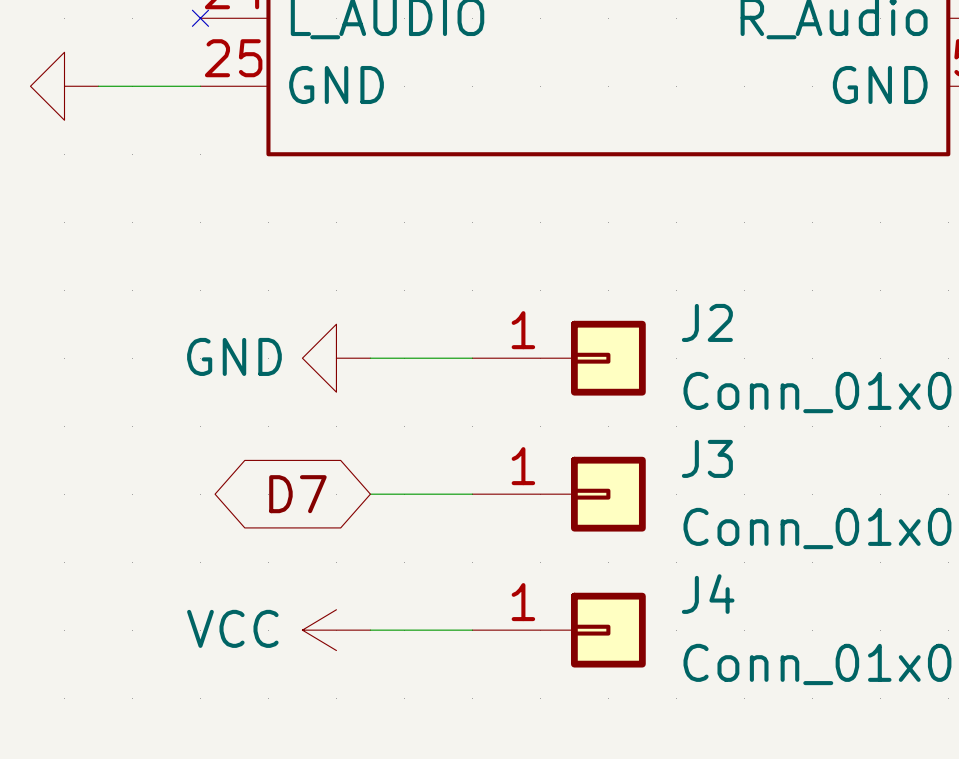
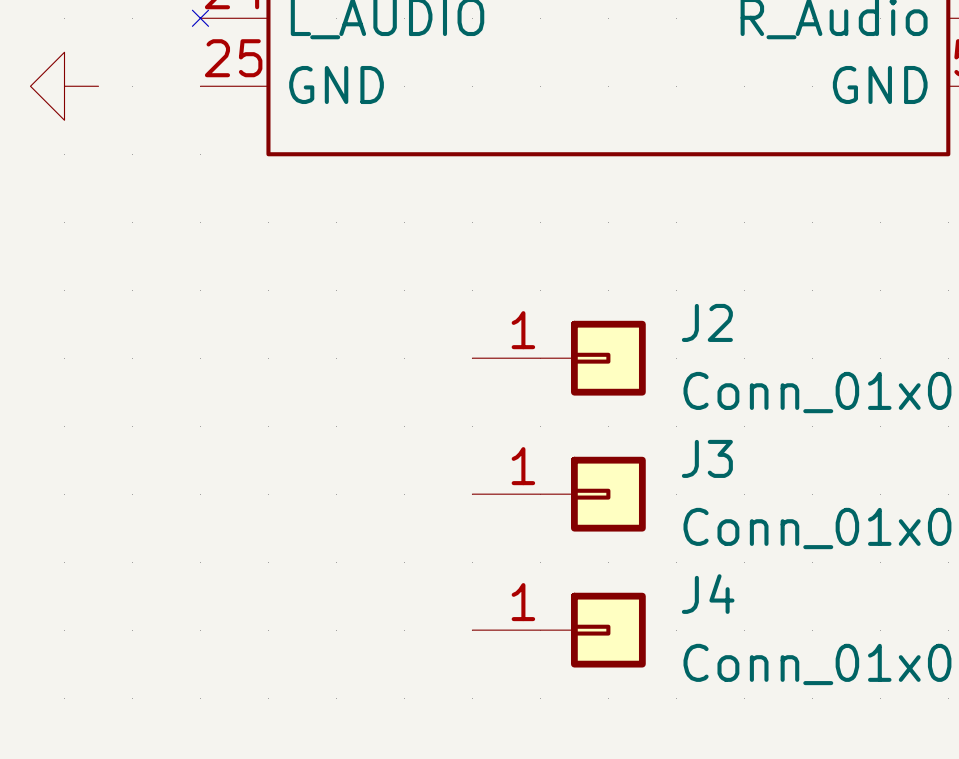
wire: (98, 86) (200, 86) -> none
power symbol: GND (336, 358) -> none
wire: (370, 358) (472, 358) -> none
global label: D7 (297, 494) -> none
wire: (370, 494) (472, 494) -> none
power symbol: VCC (336, 630) -> none
wire: (370, 630) (472, 630) -> none

